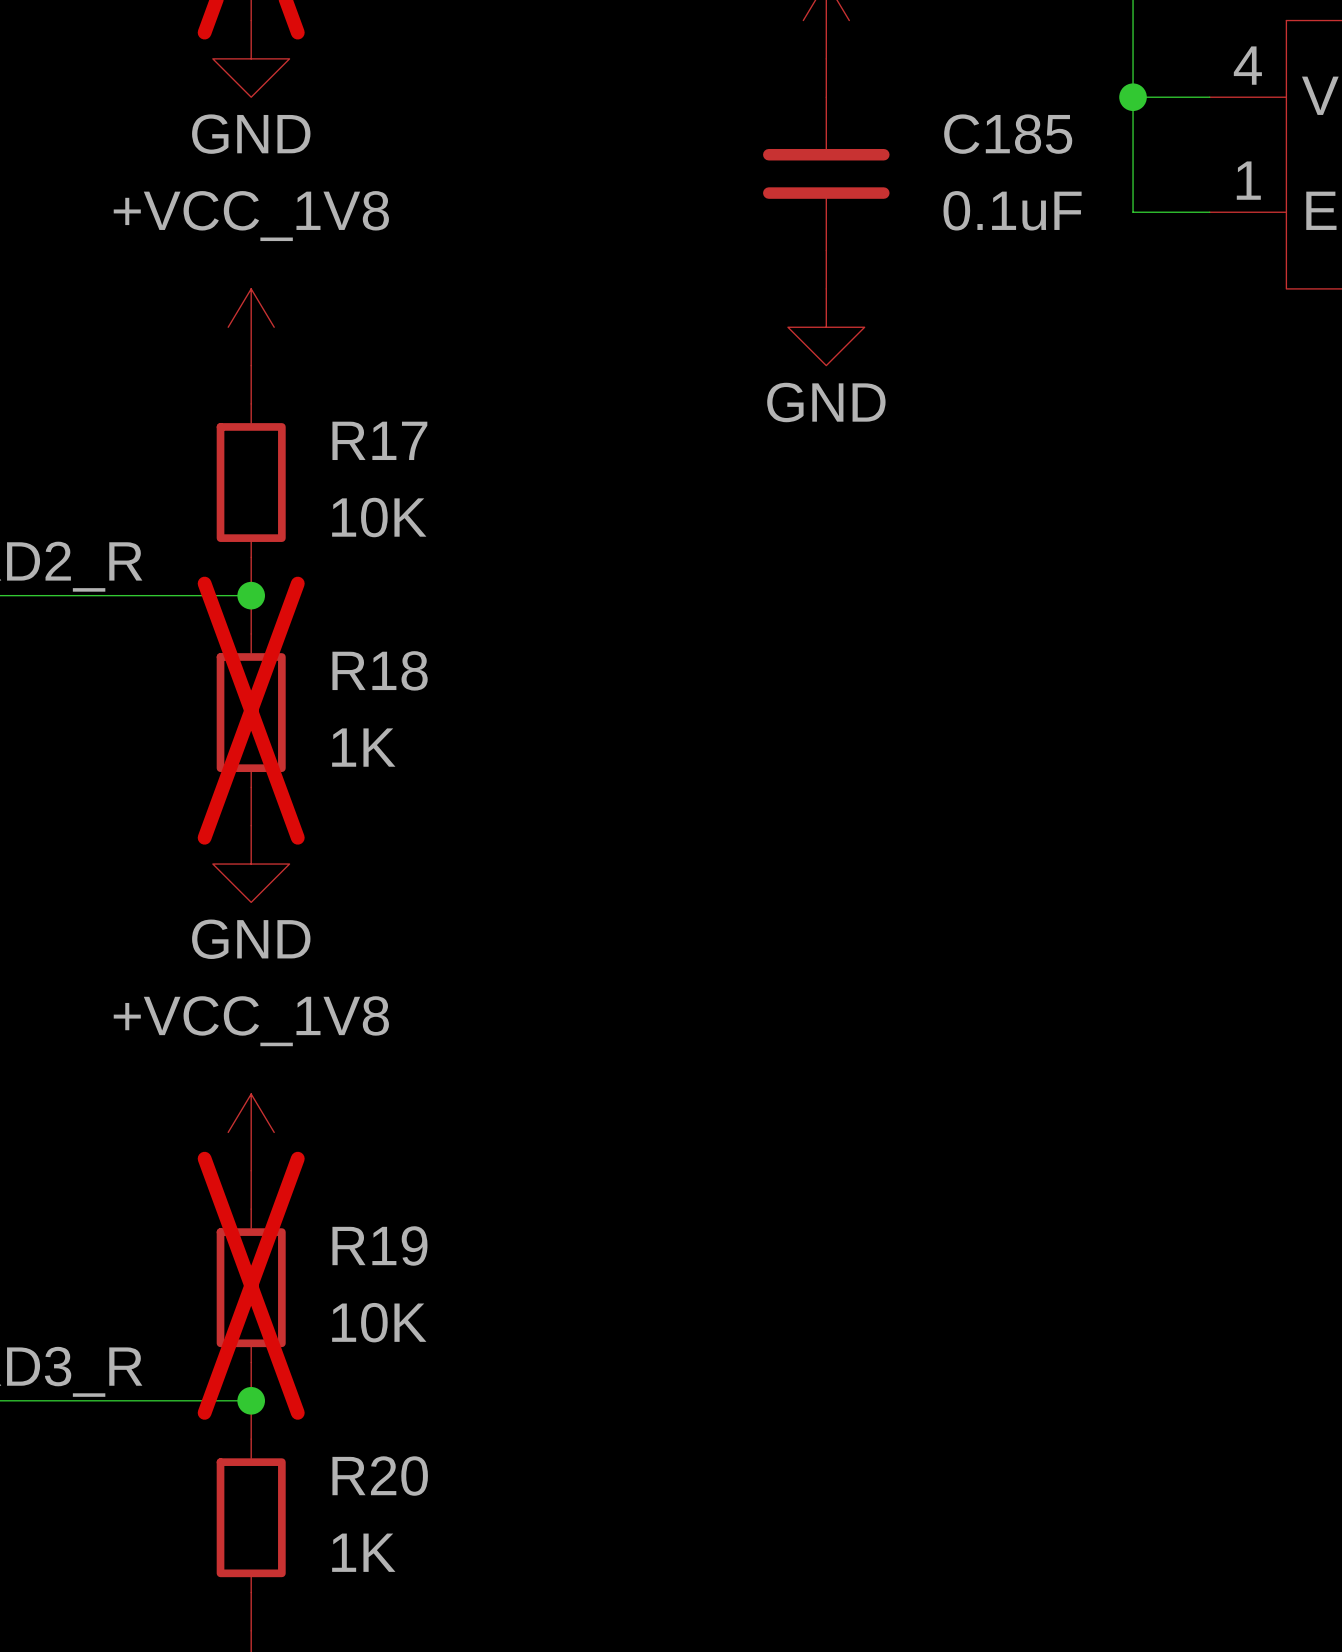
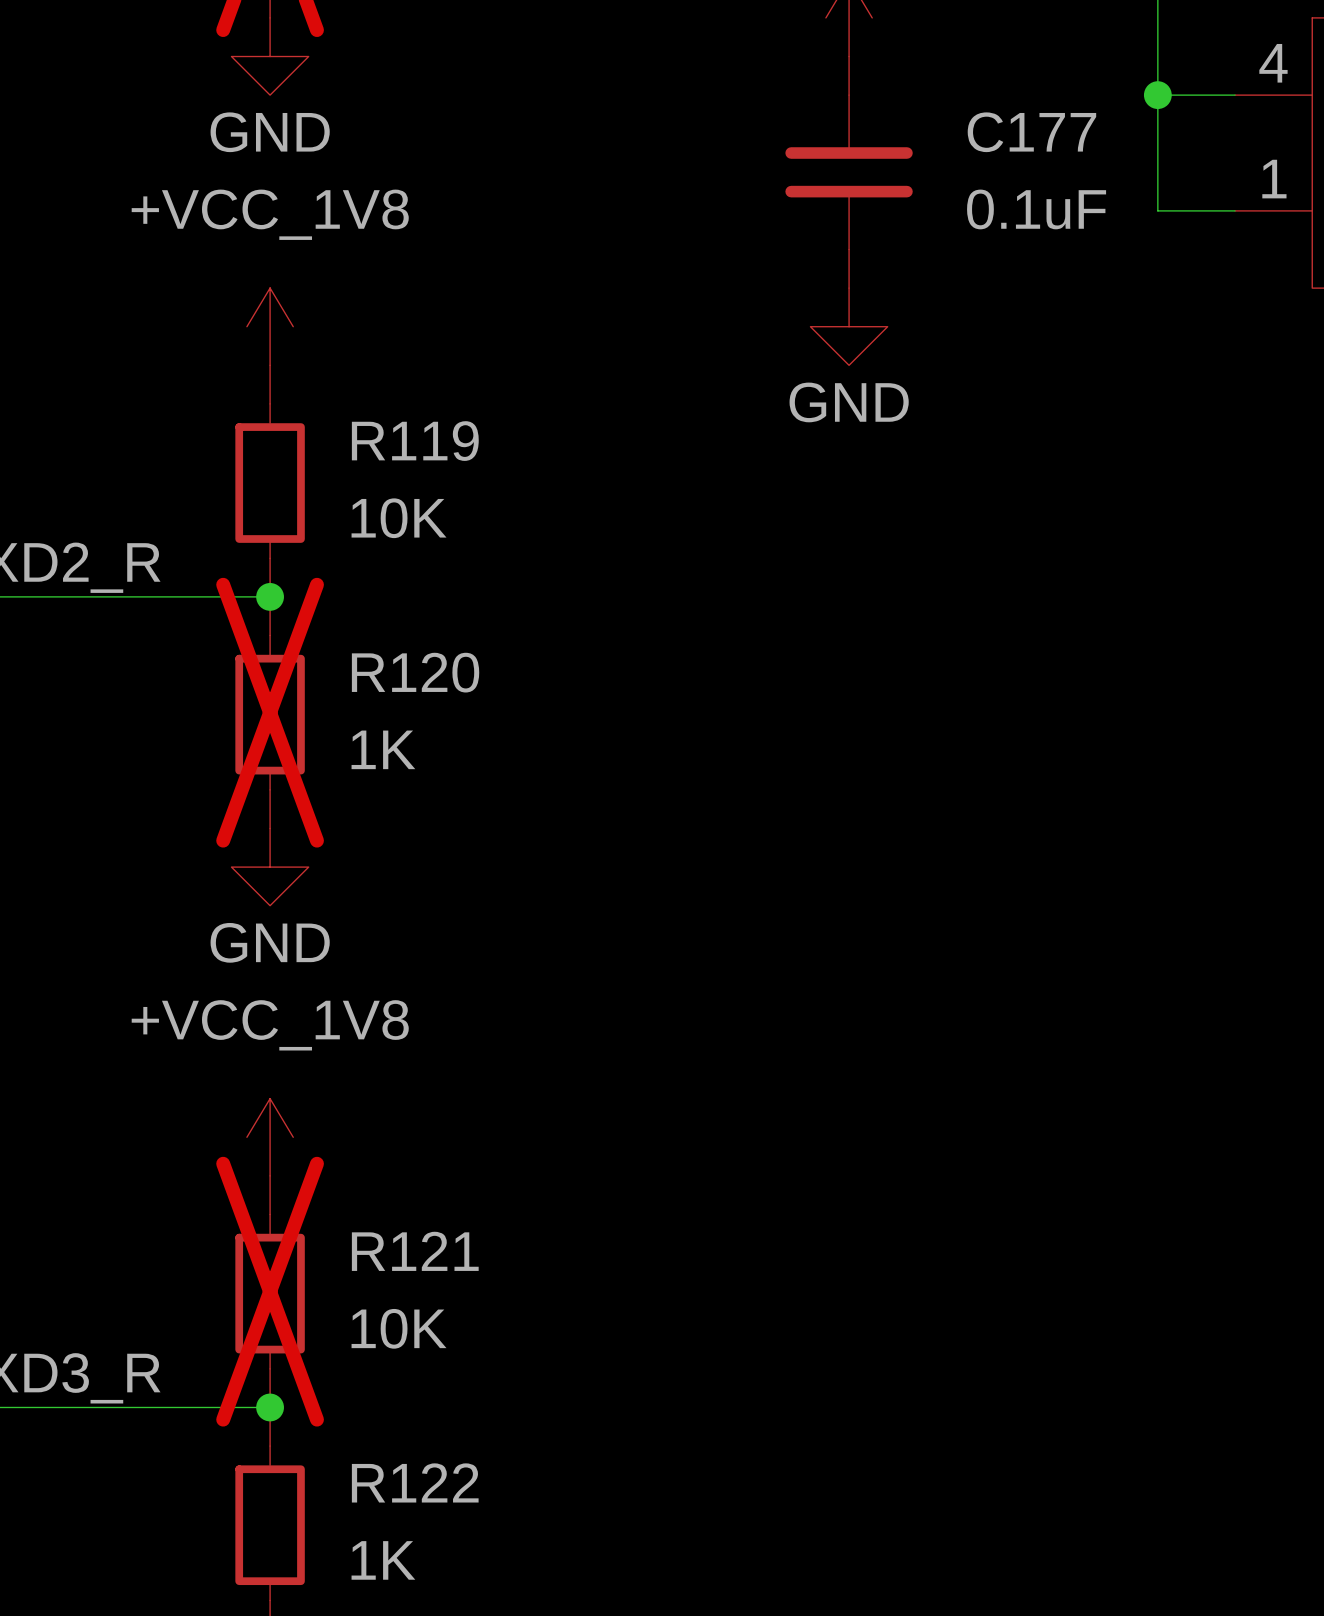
C185 name: C185 (1008, 134) -> C177 (1031, 132)
R17 name: R17 (379, 440) -> R119 (415, 441)
R18 name: R18 (380, 670) -> R120 (415, 672)
R19 name: R19 (379, 1245) -> R121 (415, 1251)
R20 name: R20 (380, 1476) -> R122 (415, 1482)

